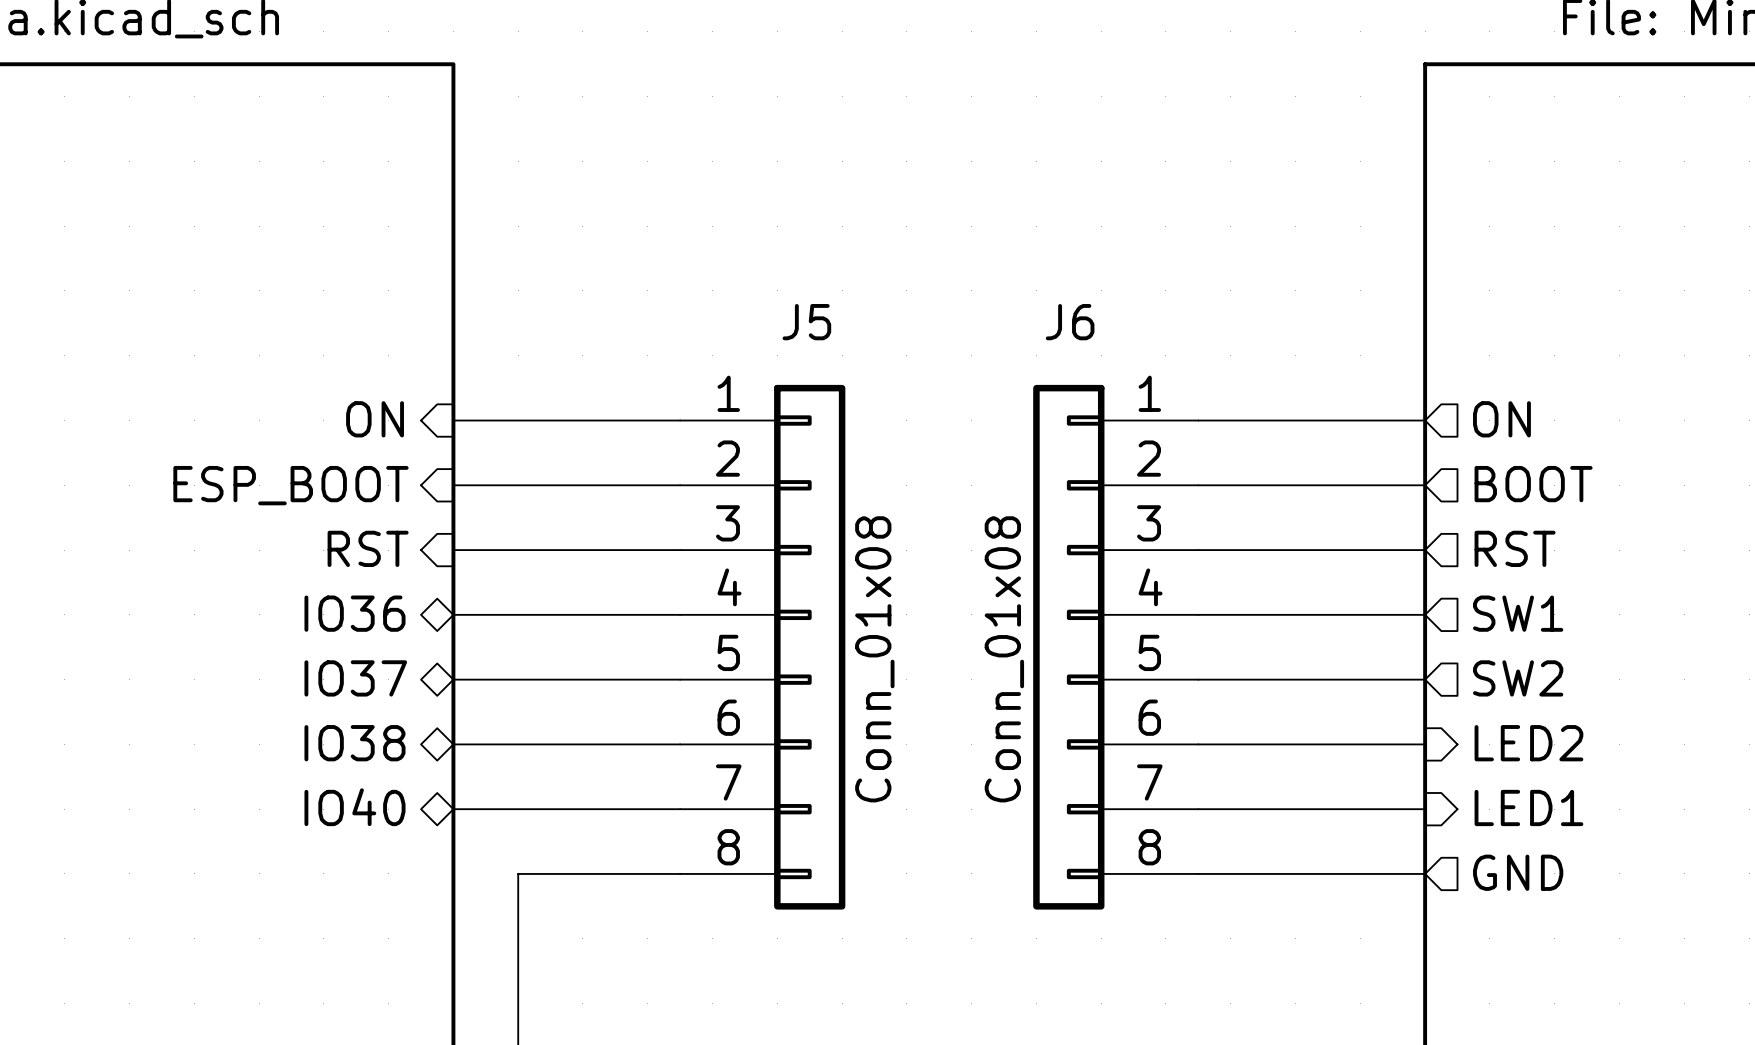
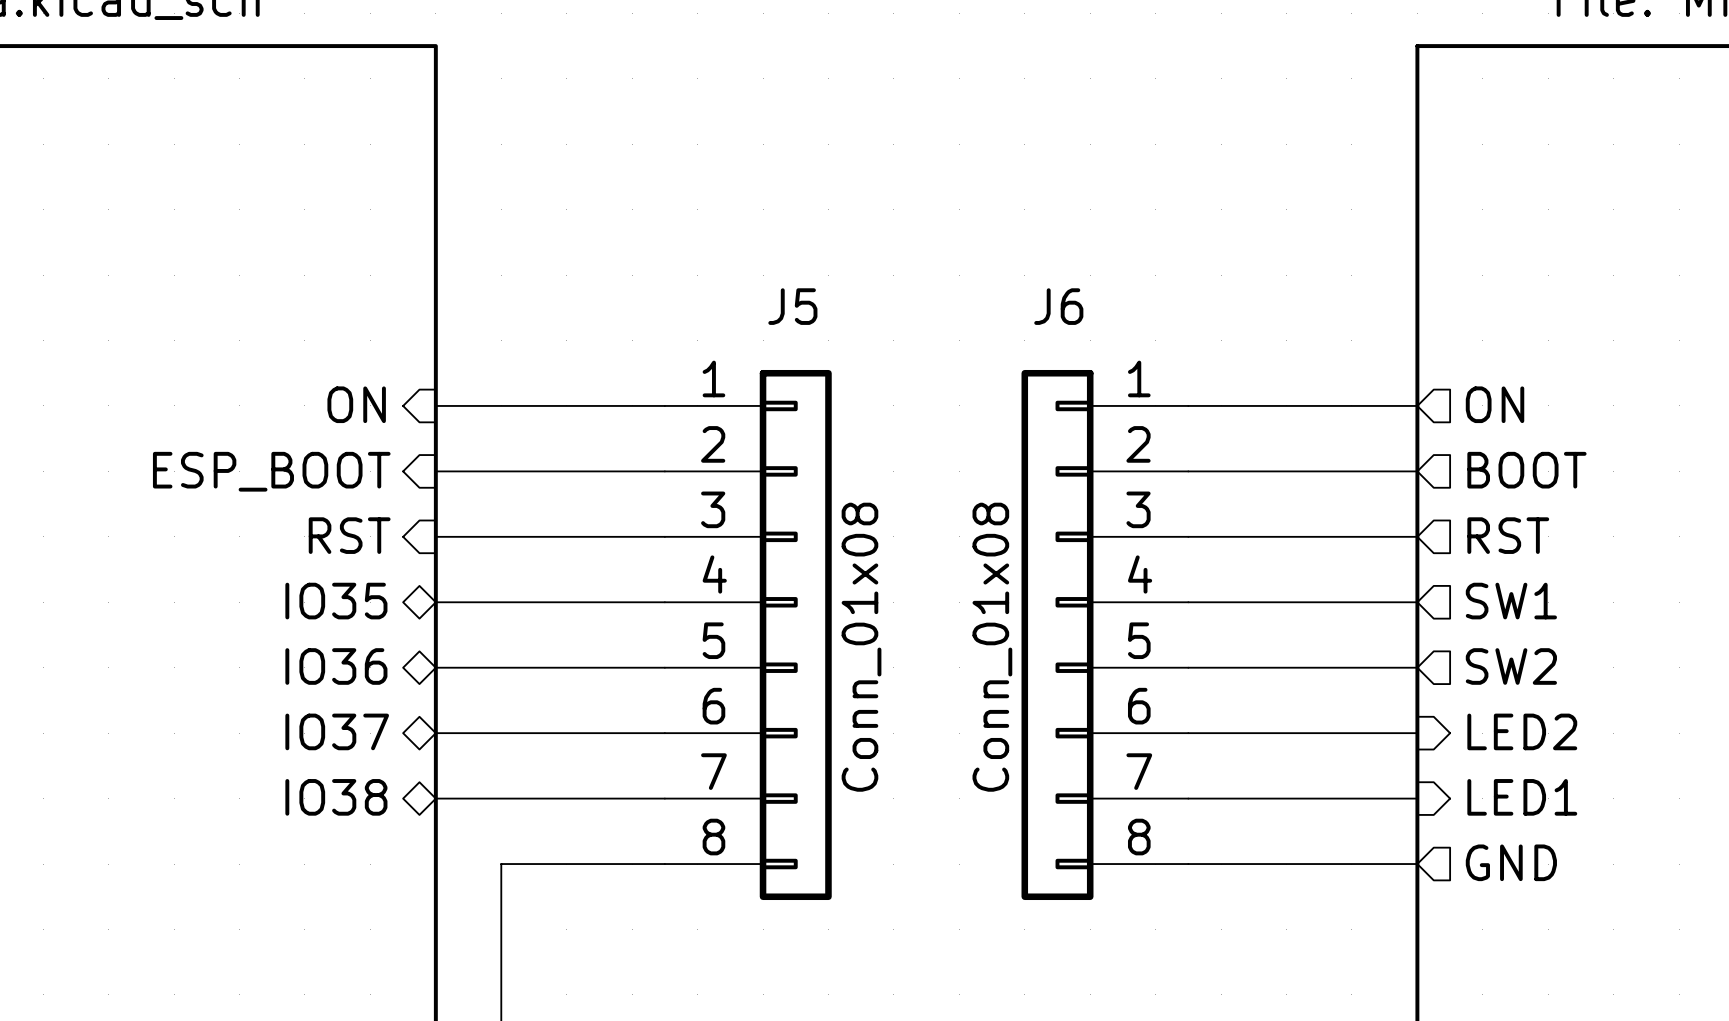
sheet pin: IO36 (354, 613) -> IO35 (336, 601)
sheet pin: IO37 (355, 678) -> IO36 (336, 666)
sheet pin: IO38 (354, 743) -> IO37 (337, 731)
sheet pin: IO40 (354, 807) -> IO38 (336, 797)

